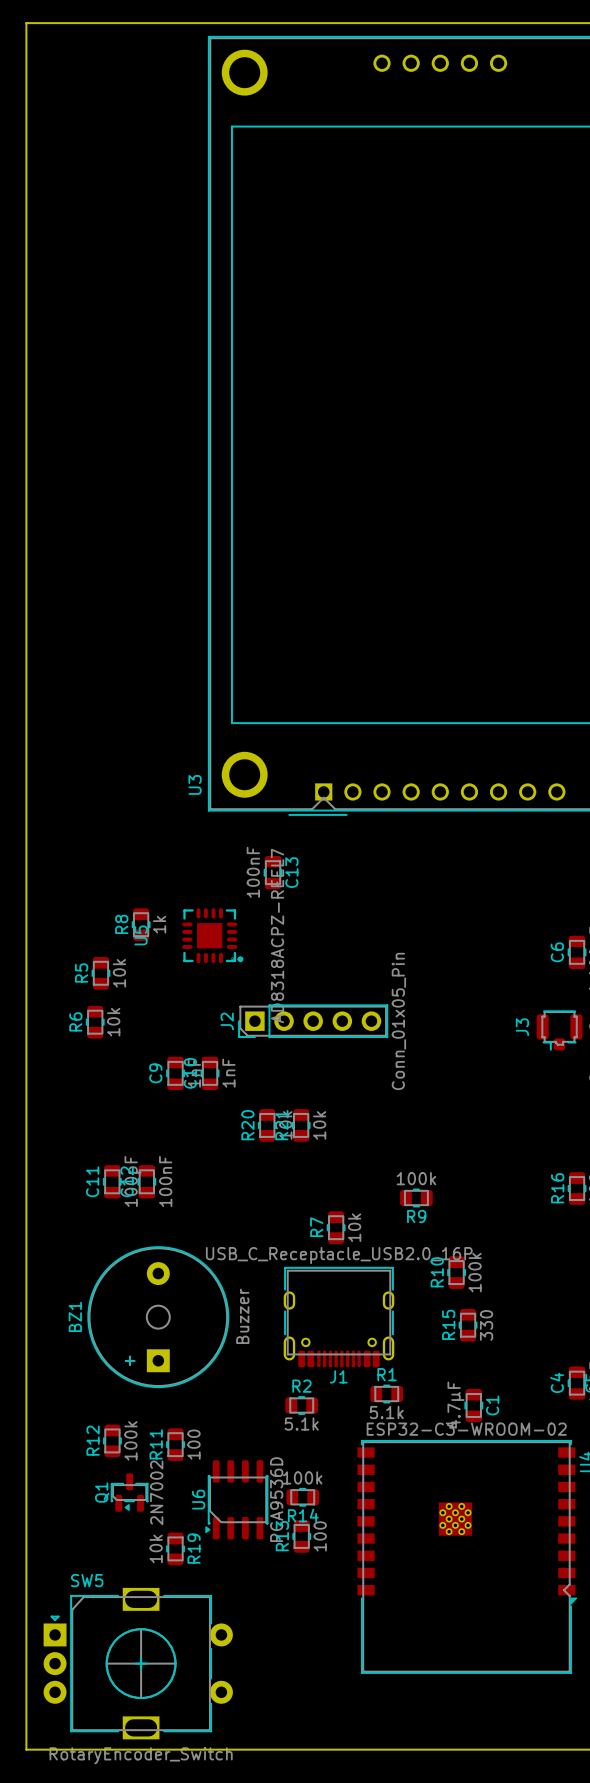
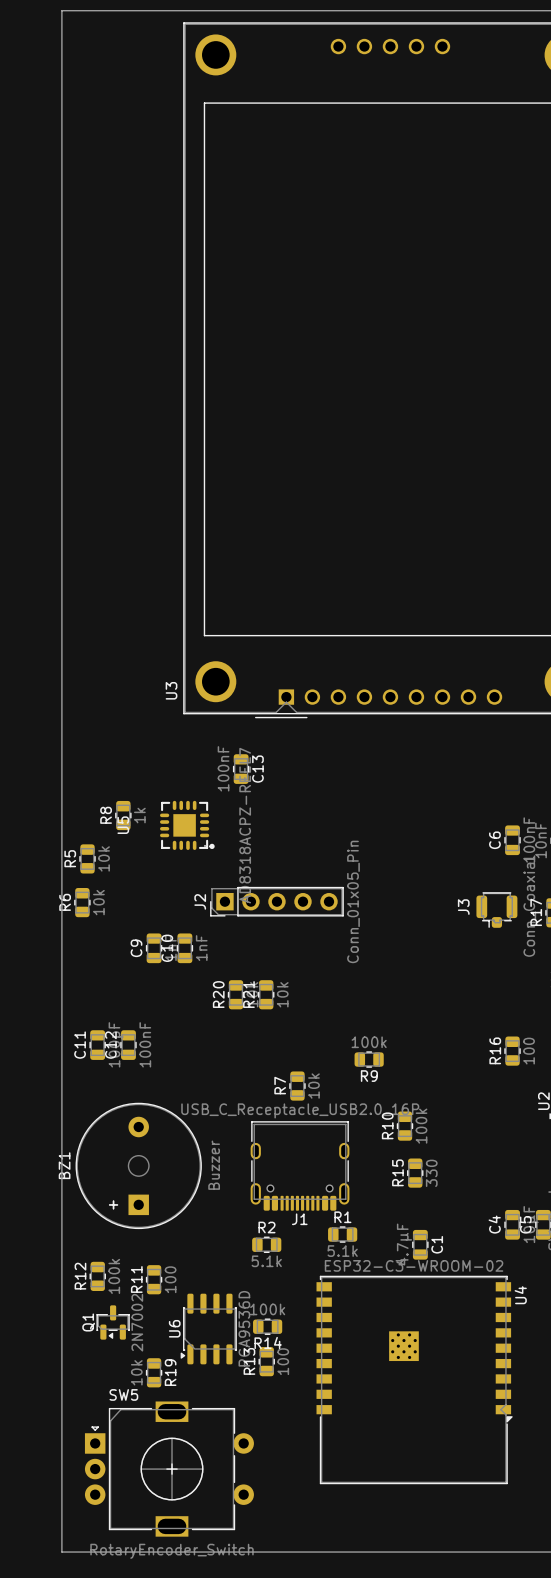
board edge: (72, 23) (26, 23) (26, 1749) (72, 1749) -> (61, 10) (61, 1552)
SW5 position: (138, 1663) -> (169, 1469)

